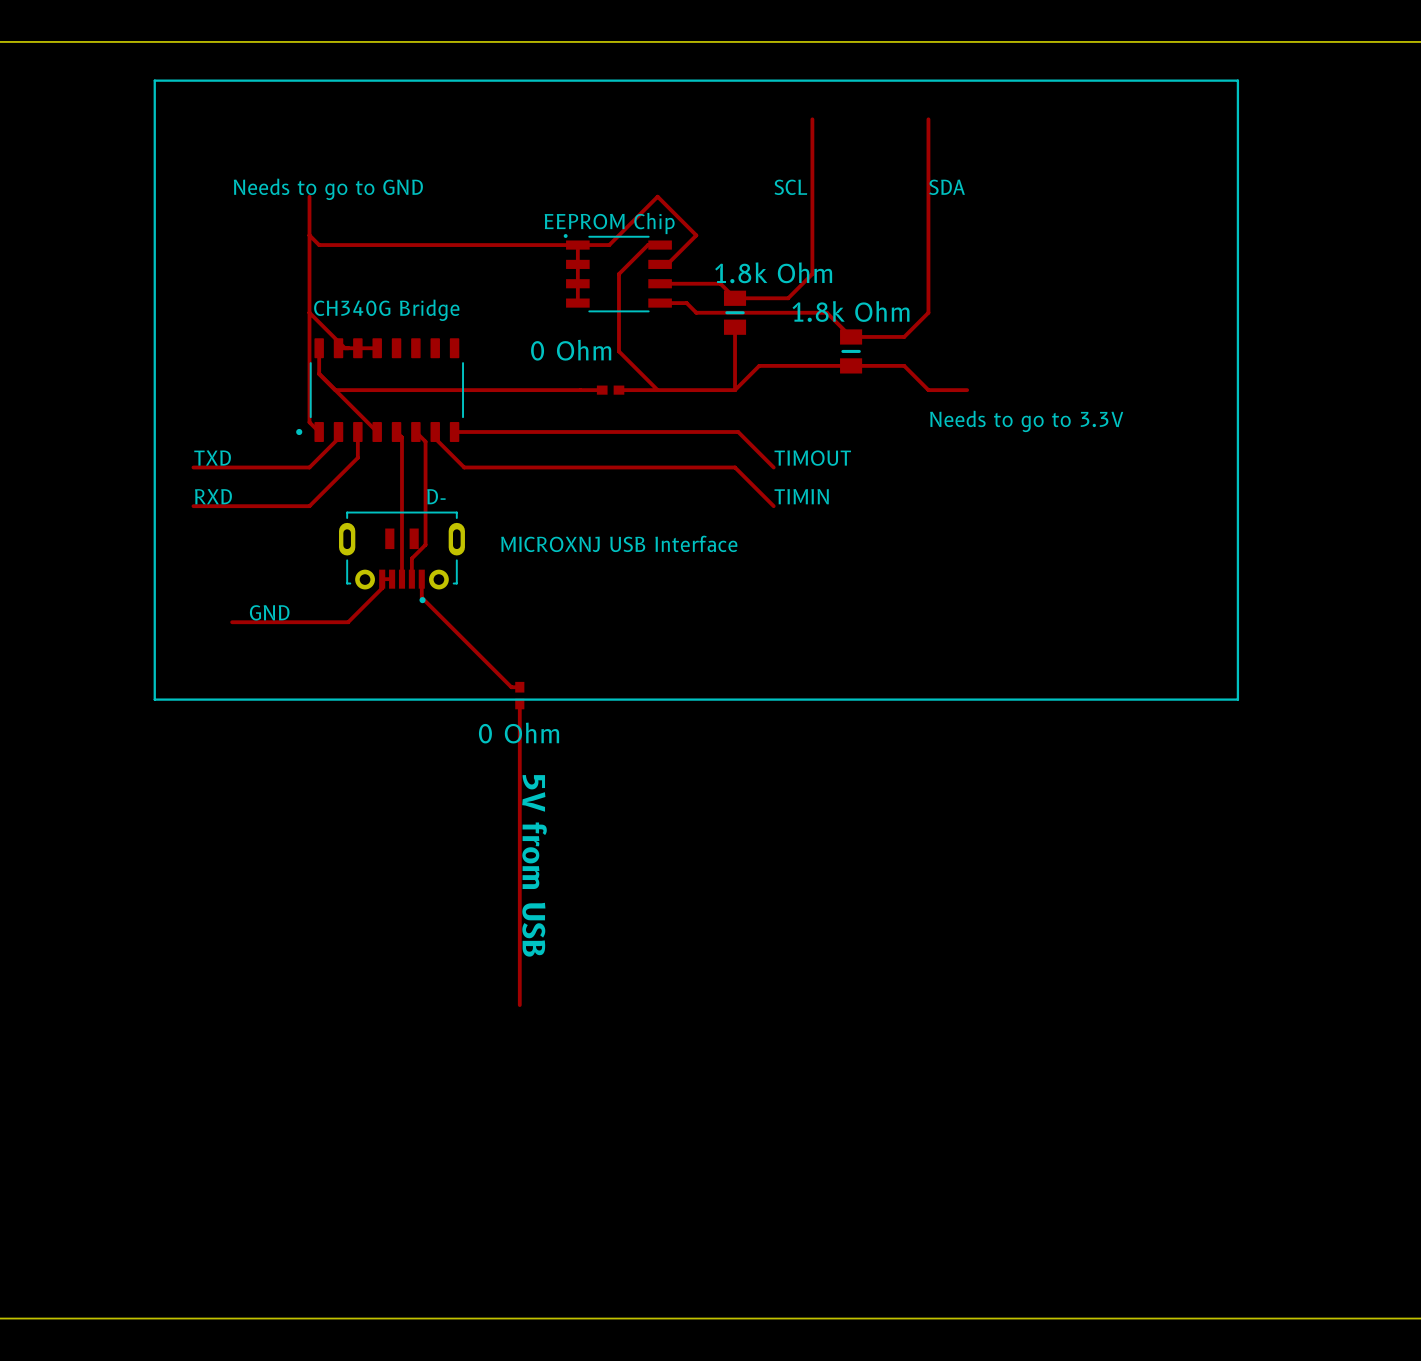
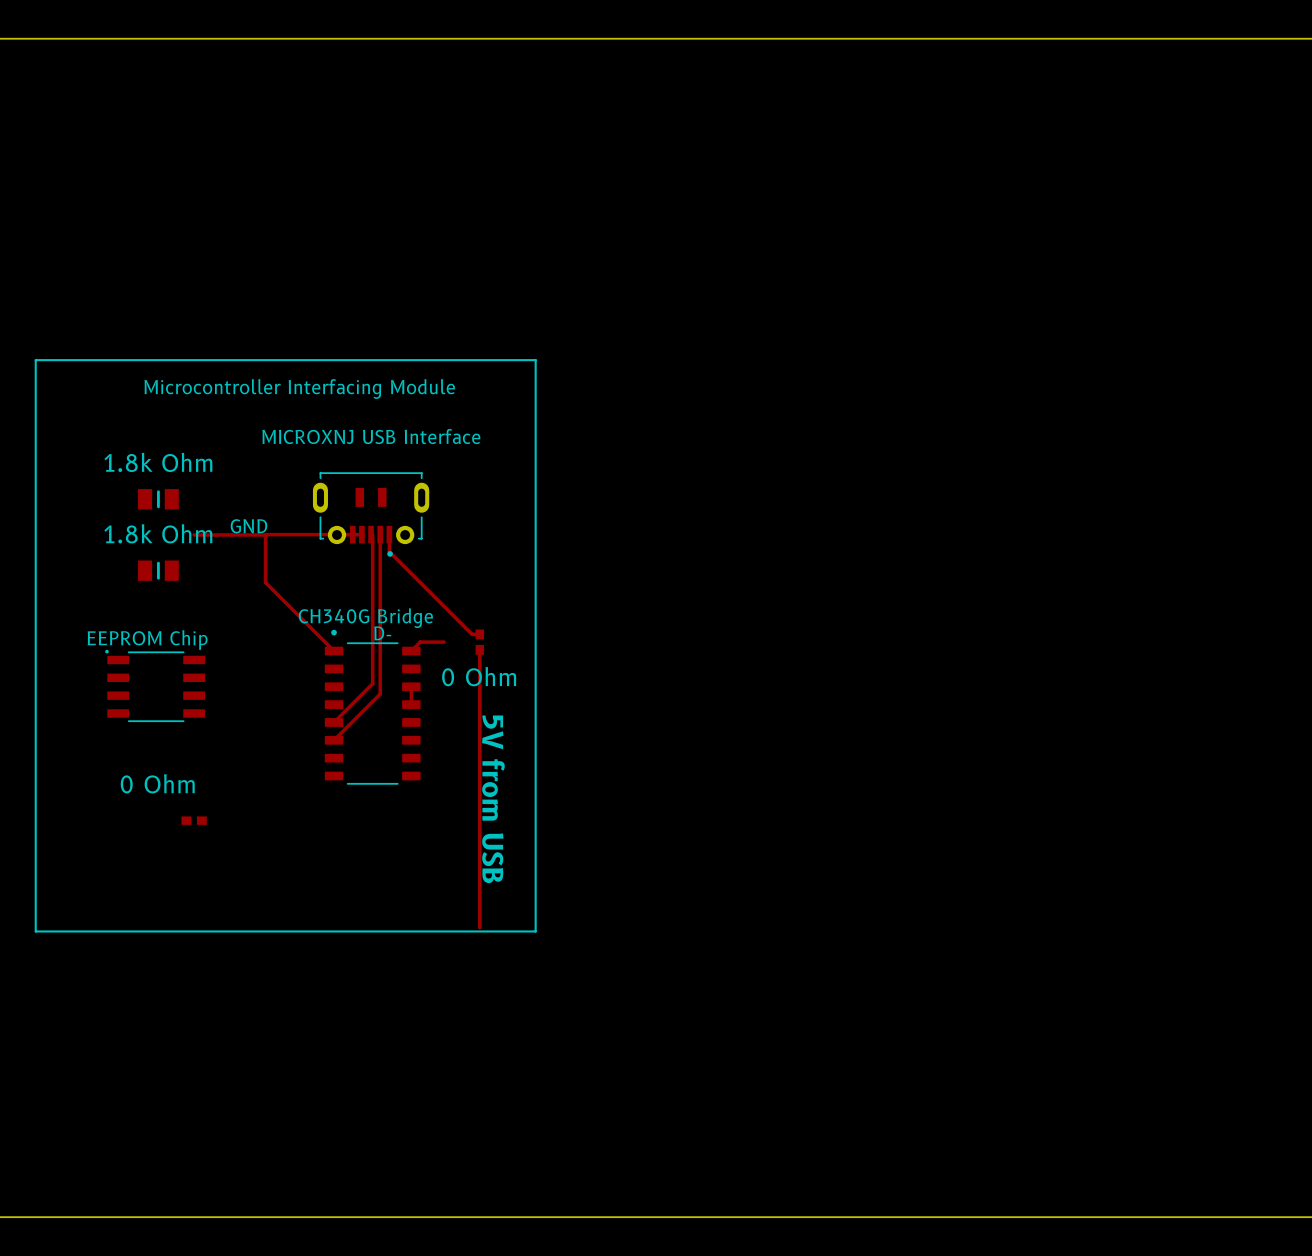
line: (154, 80) (1237, 80) (1237, 699) (154, 699) (154, 80) -> none
track: (812, 119) (812, 274) (788, 298) (735, 298) (720, 283) (660, 283) -> none
track: (928, 119) (928, 312) (904, 336) (851, 336) (826, 312) (696, 312) (686, 303) (660, 303) -> none
text: SCL (790, 187) -> none
text: SDA (947, 187) -> none
text: Needs to go to GND (328, 189) -> none
track: (309, 196) (309, 422) (319, 432) -> none
track: (309, 235) (319, 245) (609, 245) (657, 196) (696, 235) (667, 264) (660, 264) -> none
track: (577, 245) (577, 303) -> none
track: (660, 245) (647, 245) (618, 274) (618, 351) (657, 390) -> none
EEPROM Chip: (617, 273) -> none
track: (309, 312) (344, 348) -> none
1.8k Ohm: (735, 312) -> none
track: (735, 327) (735, 390) -> none
track: (319, 348) (319, 373) (377, 432) -> none
track: (338, 348) (377, 348) -> none
1.8k Ohm: (851, 351) -> none
line: none -> (35, 360) (35, 931) (535, 931) (535, 360) (35, 360)
track: (335, 390) (602, 390) -> none
CH340G Bridge rotation: 0° (380, 390) -> 90° clockwise (372, 707)
CH340G Bridge position: (380, 390) -> (372, 707)
0 Ohm: (610, 390) -> none
track: (618, 390) (735, 390) -> none
track: (735, 390) (759, 365) (904, 365) (928, 390) (967, 390) -> none
text: none -> Microcontroller Interfacing Module (299, 389)
text: Needs to go to 3.3V (1026, 421) -> none
track: (338, 432) (338, 438) (309, 467) (193, 467) -> none
track: (357, 432) (357, 457) (309, 506) (193, 506) -> none
track: (396, 432) (401, 437) (401, 579) -> none
track: (415, 432) (425, 441) (425, 544) (411, 558) (411, 579) -> (334, 740) (380, 694) (380, 534)
track: (435, 432) (435, 438) (464, 467) (735, 467) (773, 506) -> none
track: (454, 432) (738, 432) (773, 467) -> none
text: TXD (212, 458) -> none
text: TIMOUT (812, 458) -> none
text: RXD (213, 496) -> none
text position: D- (436, 496) -> D- (382, 633)
text: TIMIN (801, 496) -> none
1.8k Ohm: none -> (158, 499)
MICROXNJ USB Interface name position: MICROXNJ USB Interface (619, 543) -> MICROXNJ USB Interface (371, 436)
track: none -> (194, 534) (265, 534)
track: none -> (265, 534) (265, 582) (334, 651)
track: (382, 579) (382, 588) (348, 622) (232, 622) -> (352, 534) (265, 534)
track: none -> (372, 534) (372, 683) (334, 722)
text position: GND (269, 612) -> GND (248, 526)
1.8k Ohm: none -> (158, 570)
track: none -> (444, 642) (420, 642) (411, 651)
EEPROM Chip: none -> (155, 685)
track: none -> (411, 686) (411, 704)
0 Ohm: none -> (194, 820)

